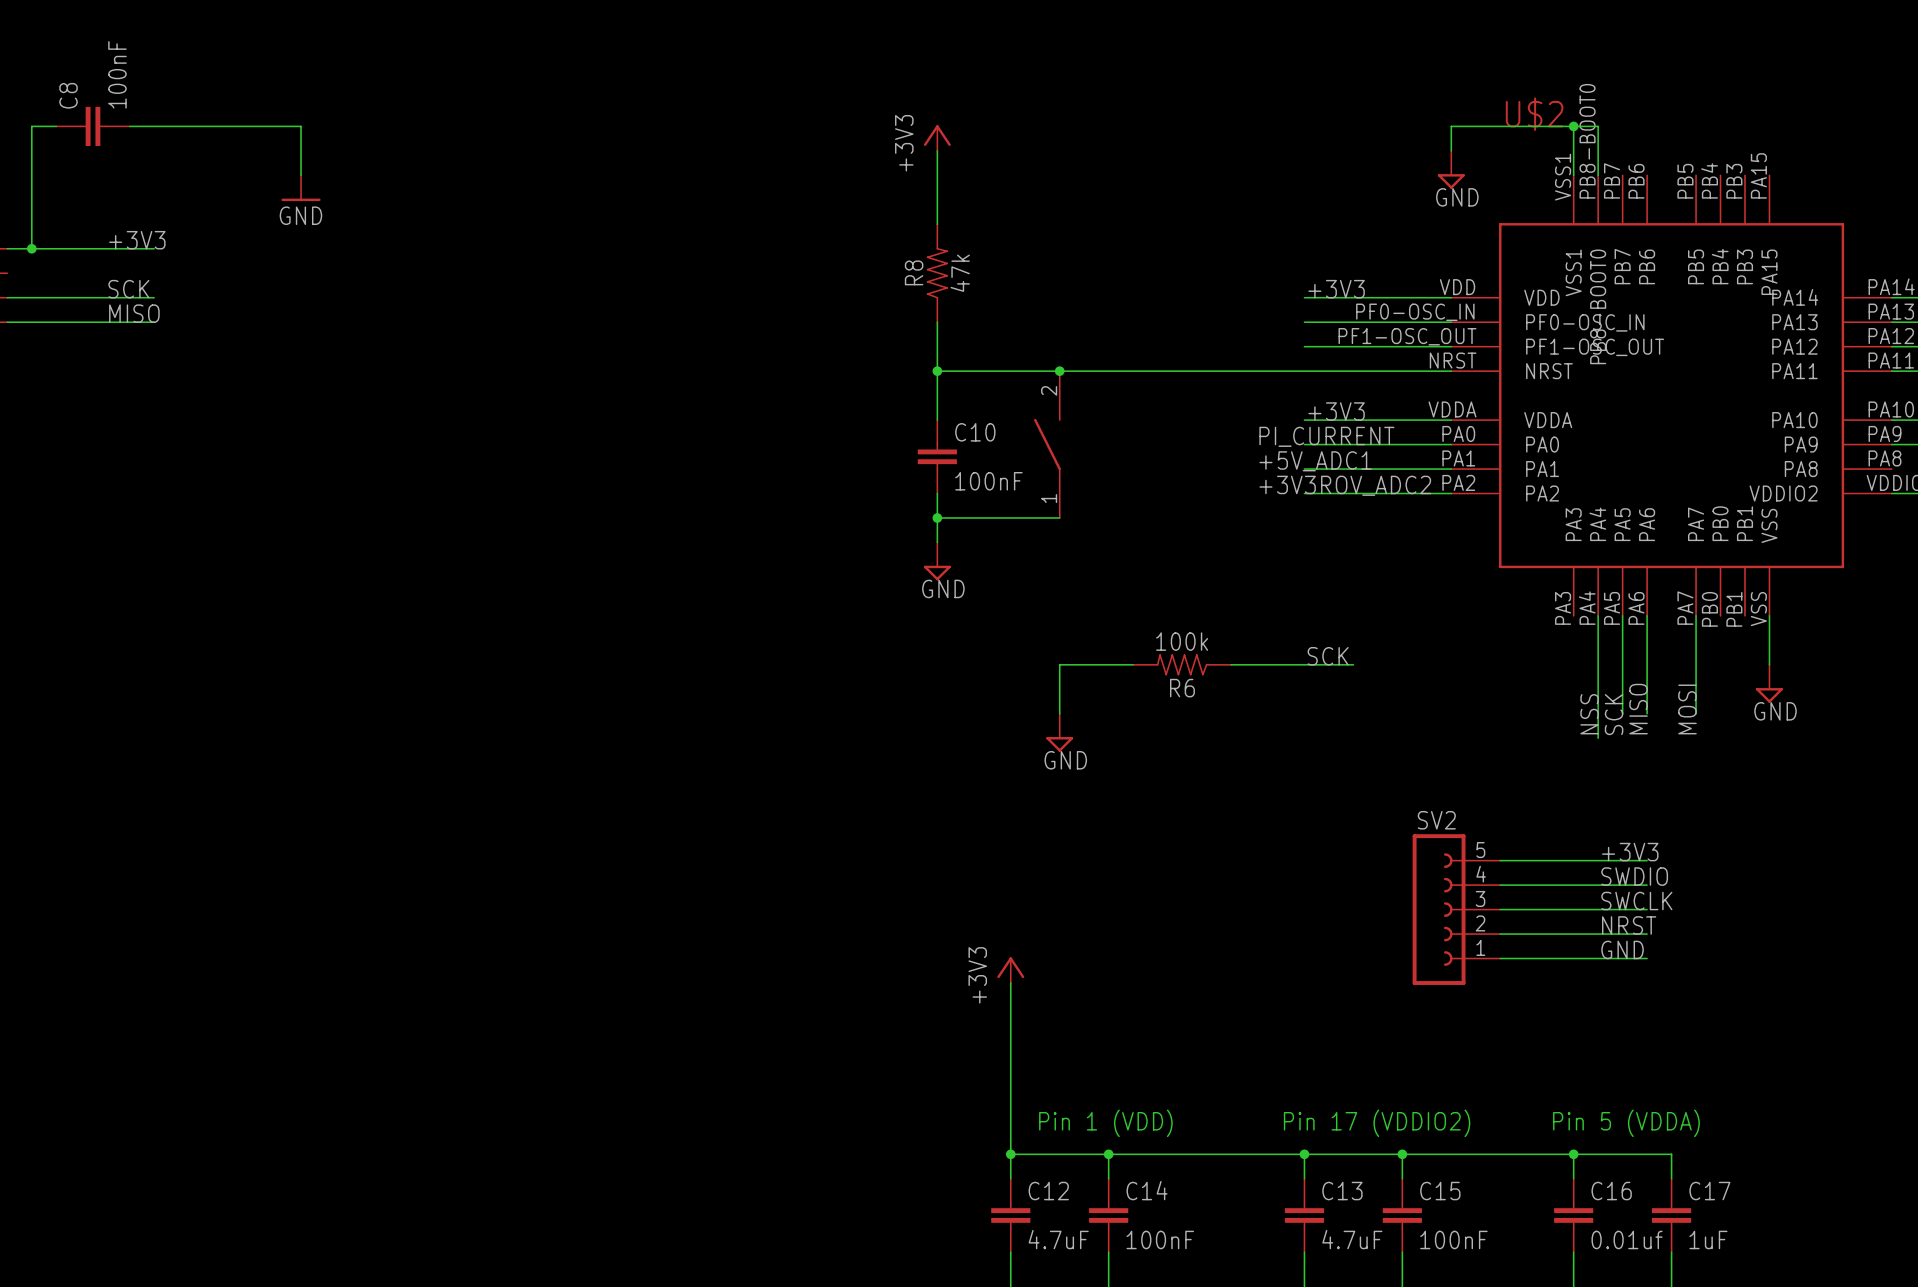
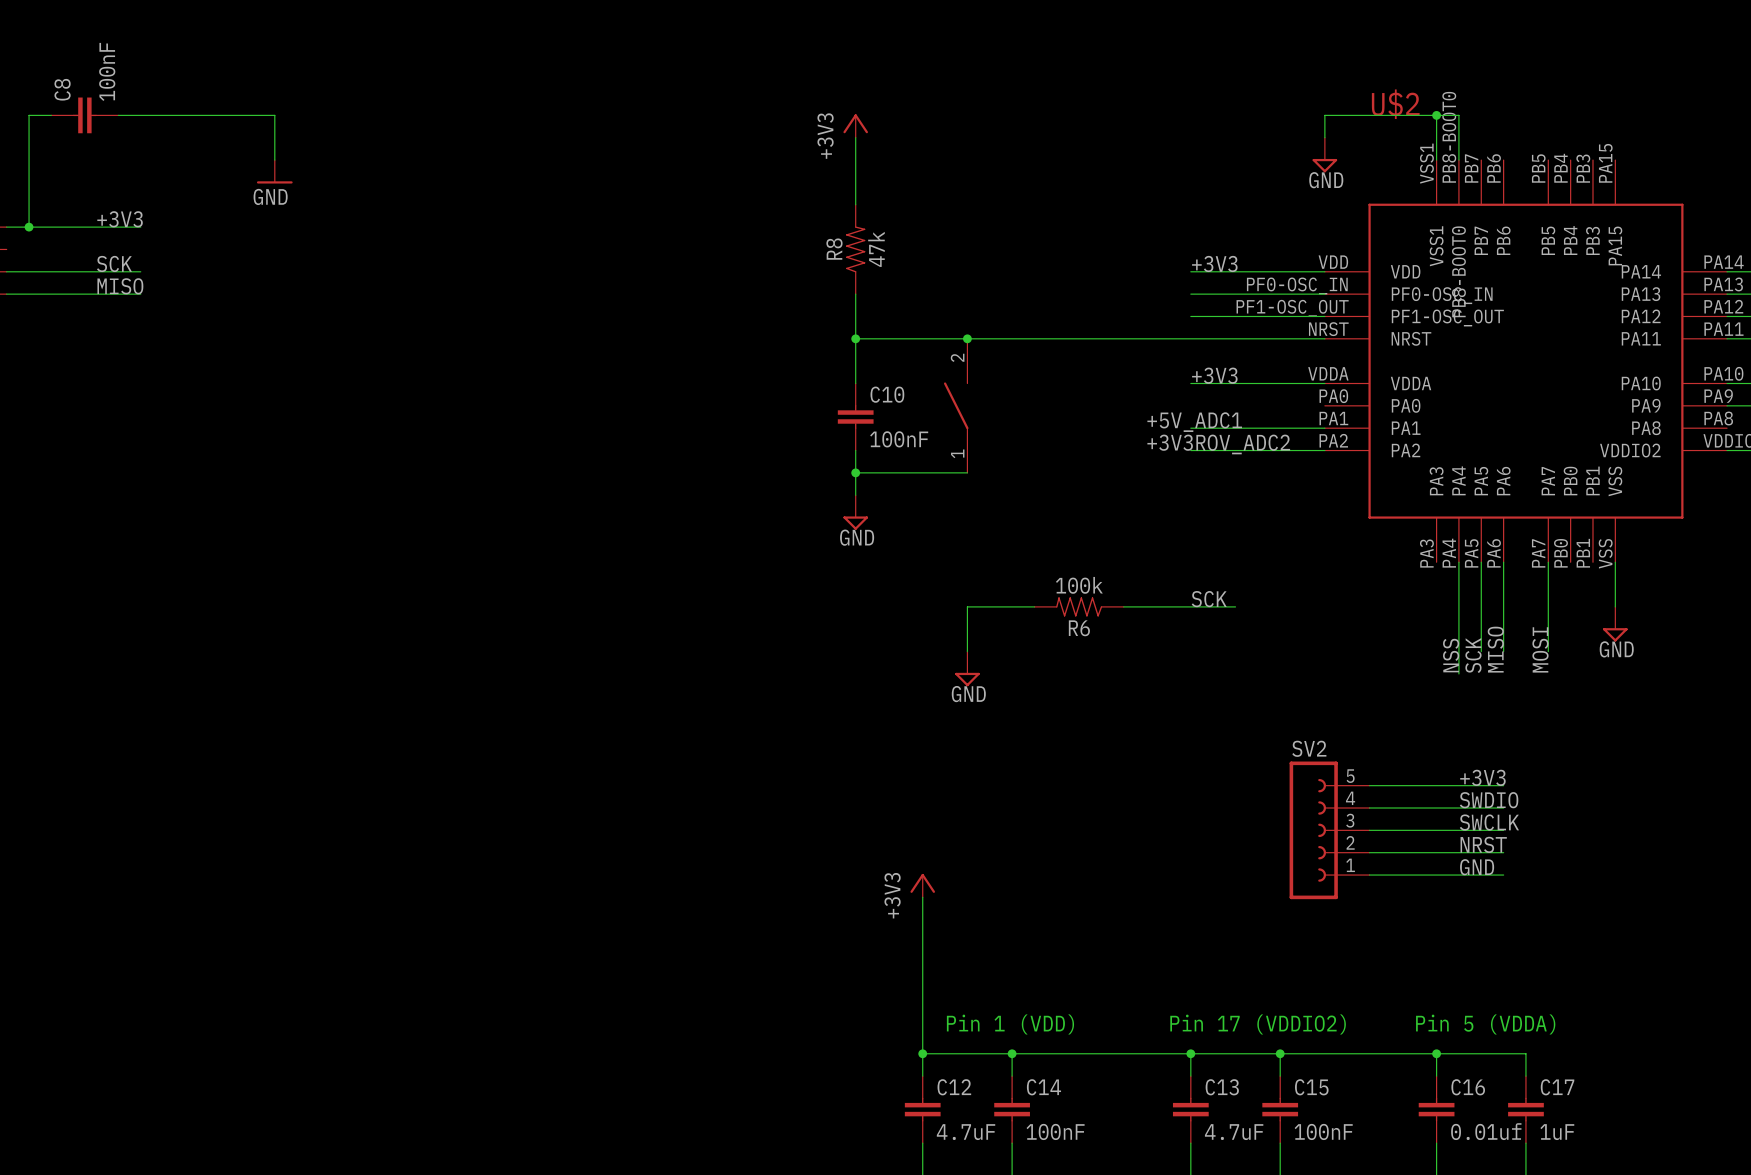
label: PI_CURRENT (1326, 436) -> none
wire: (1304, 444) (1451, 444) -> none

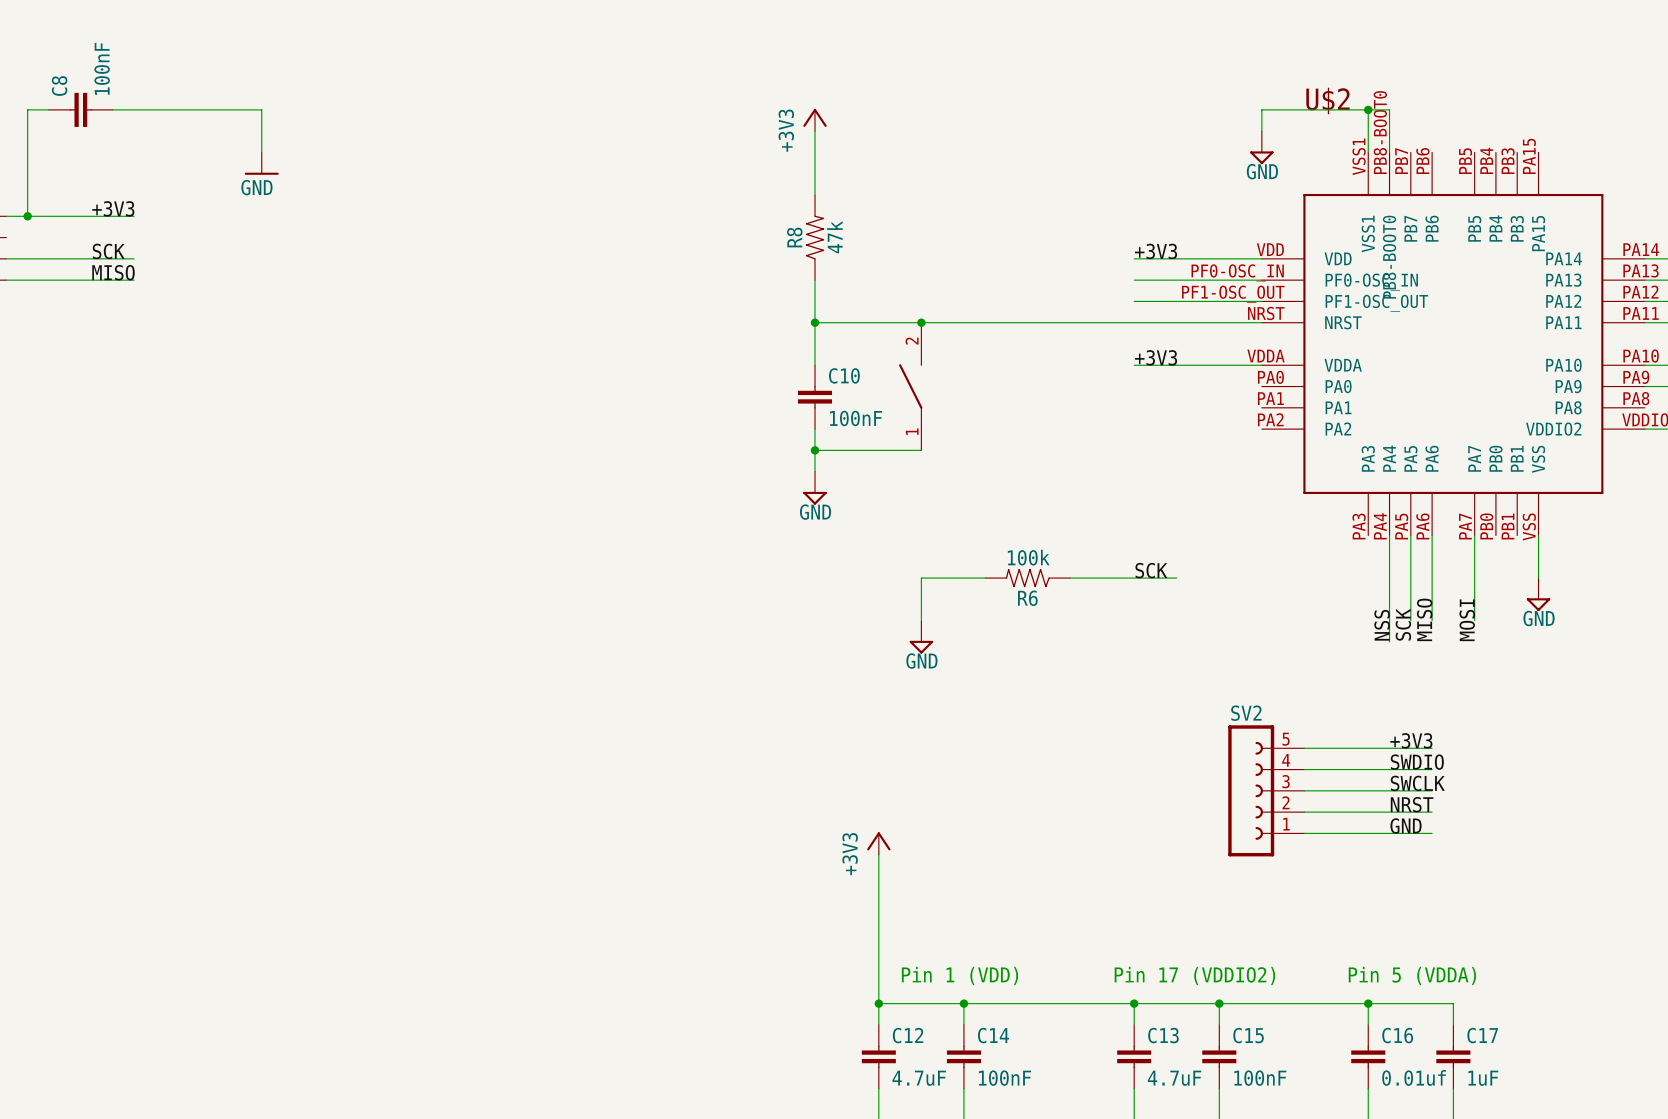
label: +5V_ADC1 (1194, 422) -> none
wire: (1190, 428) (1324, 428) -> none
label: +3V3ROV_ADC2 (1218, 444) -> none
wire: (1190, 450) (1324, 450) -> none

